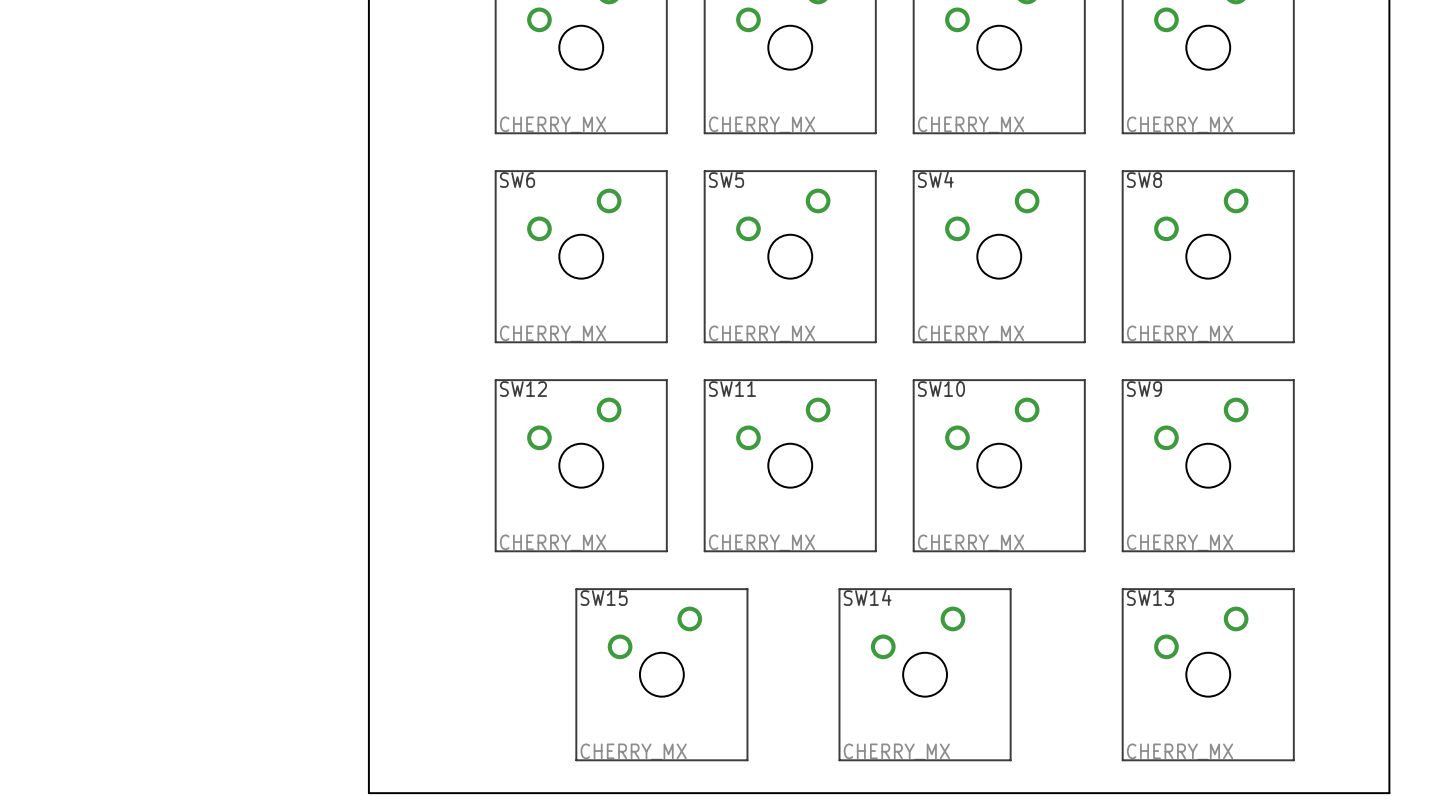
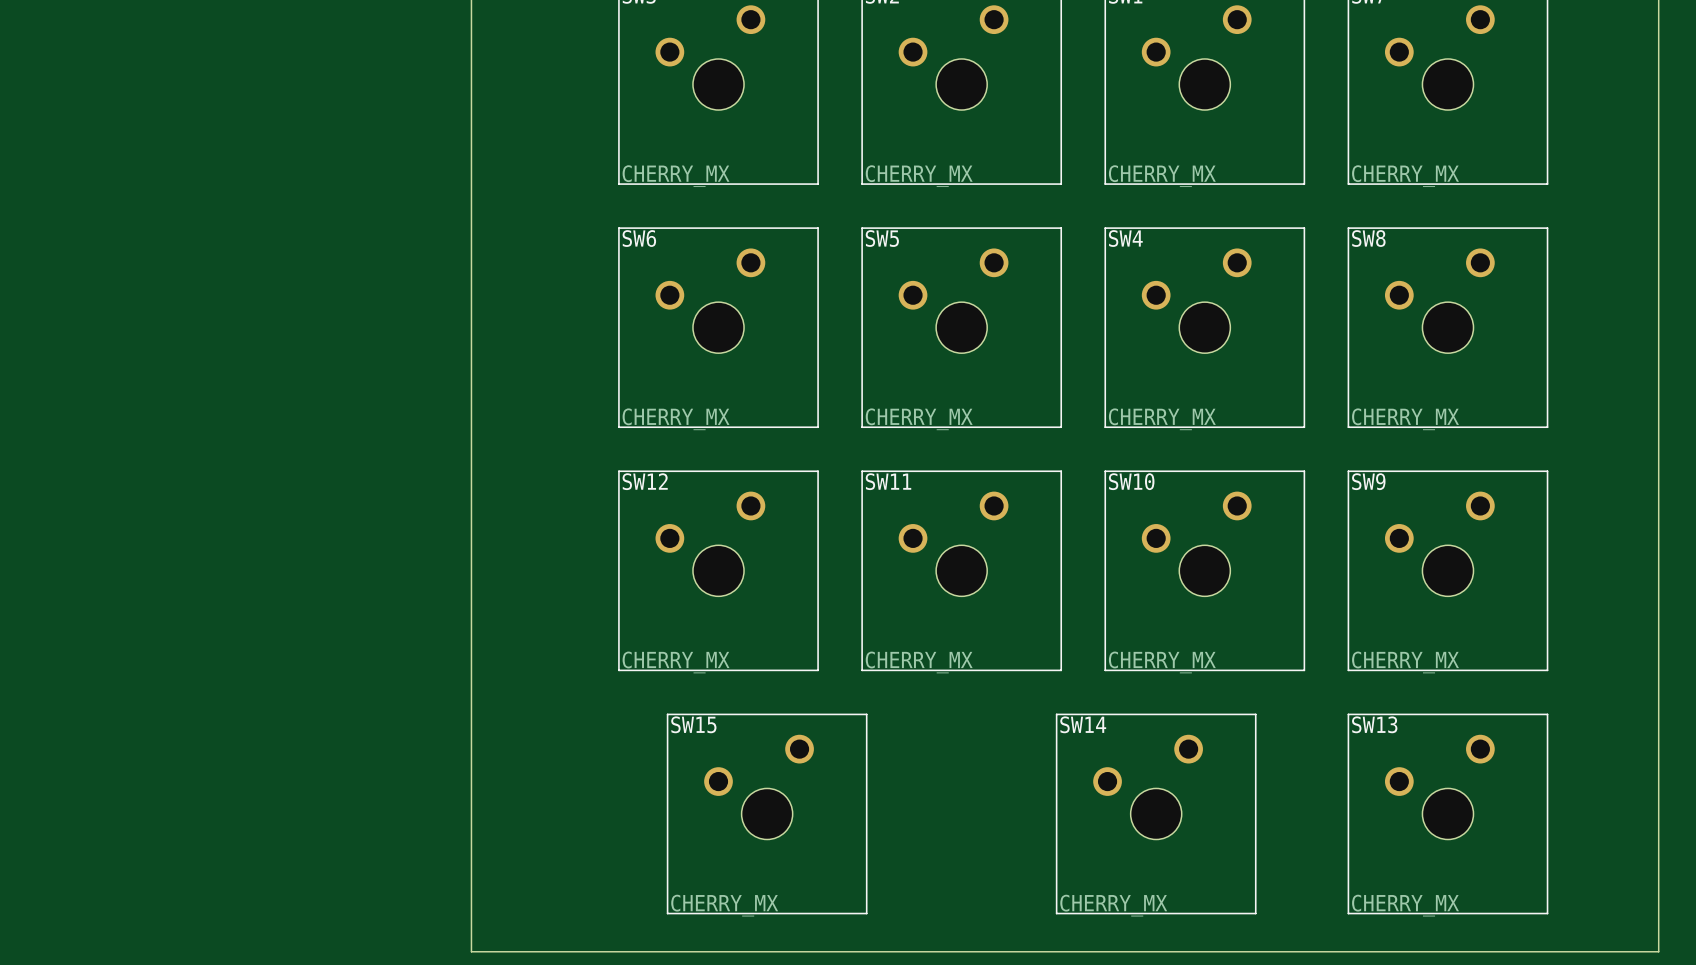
SW15 position: (661, 674) -> (767, 813)
SW14 position: (925, 674) -> (1156, 813)

